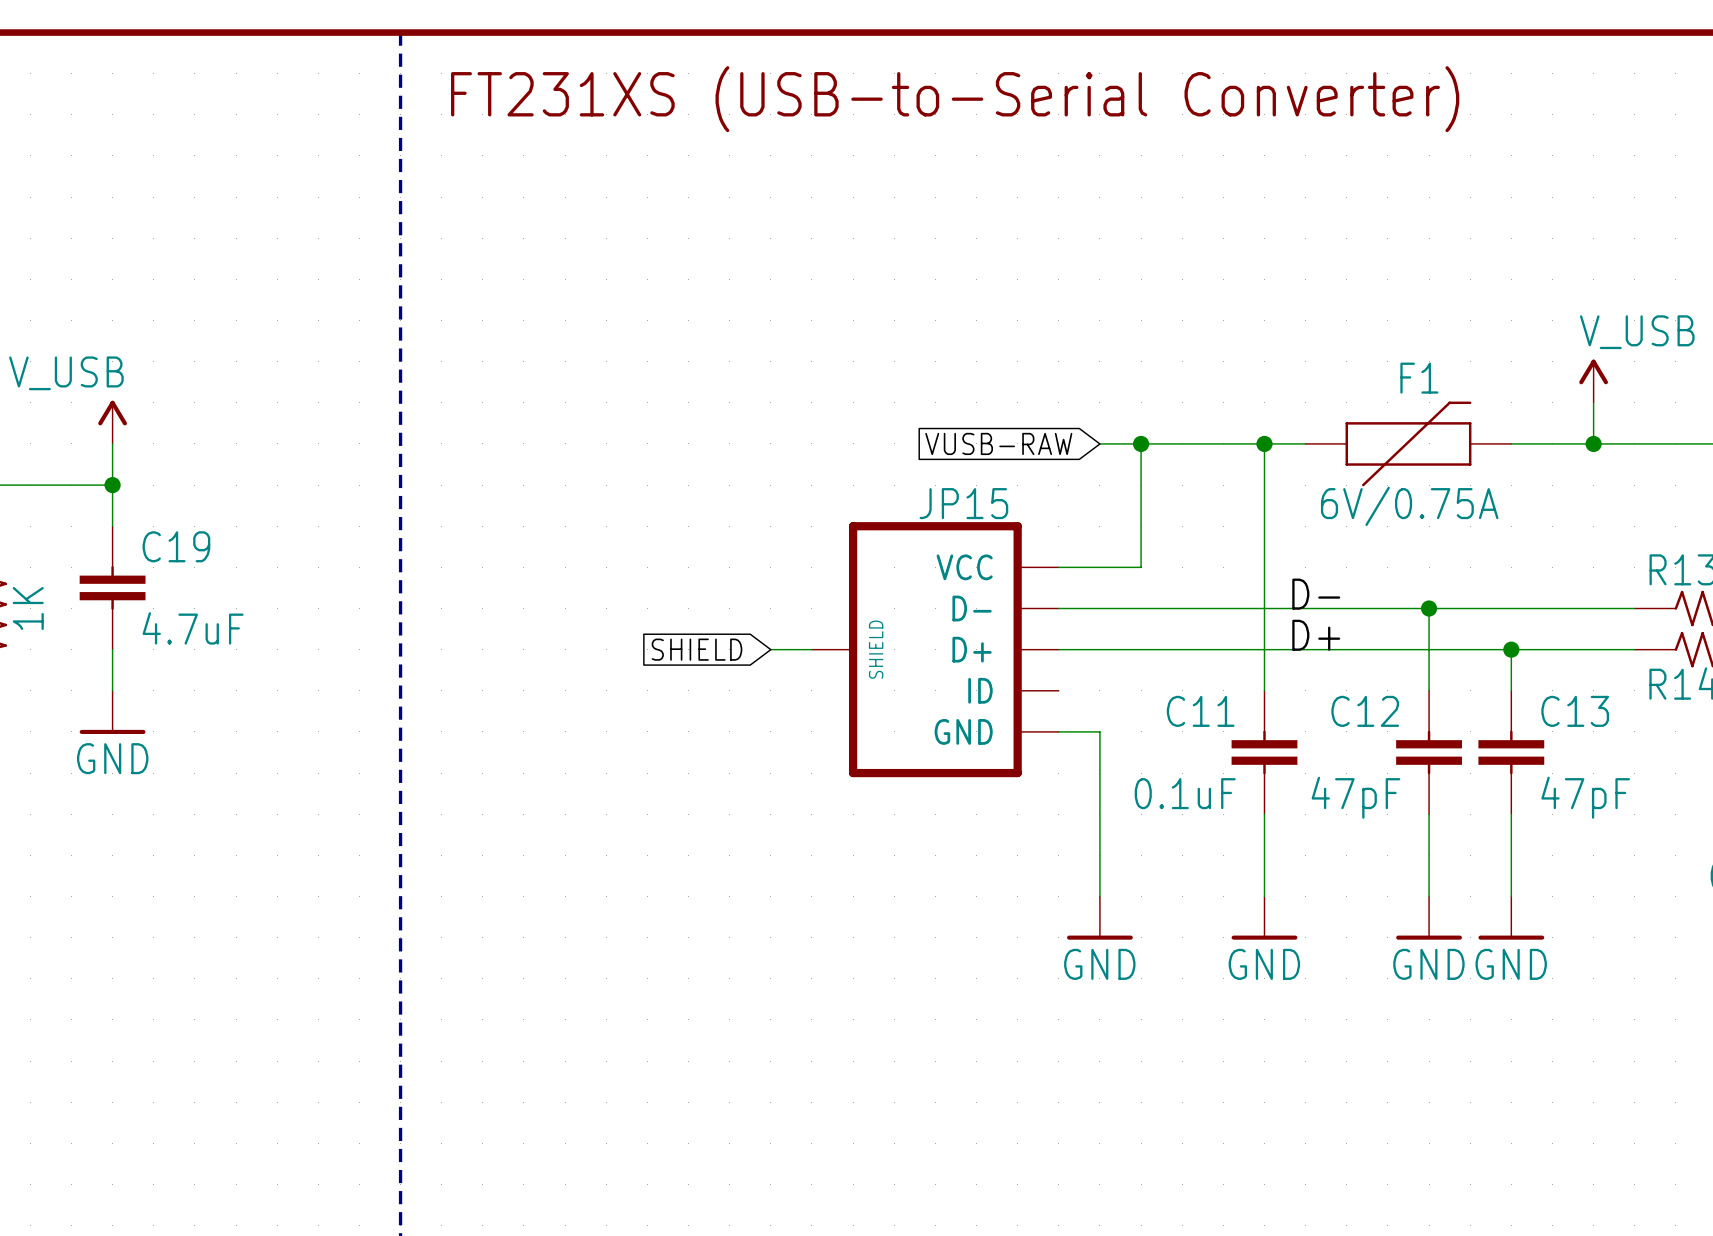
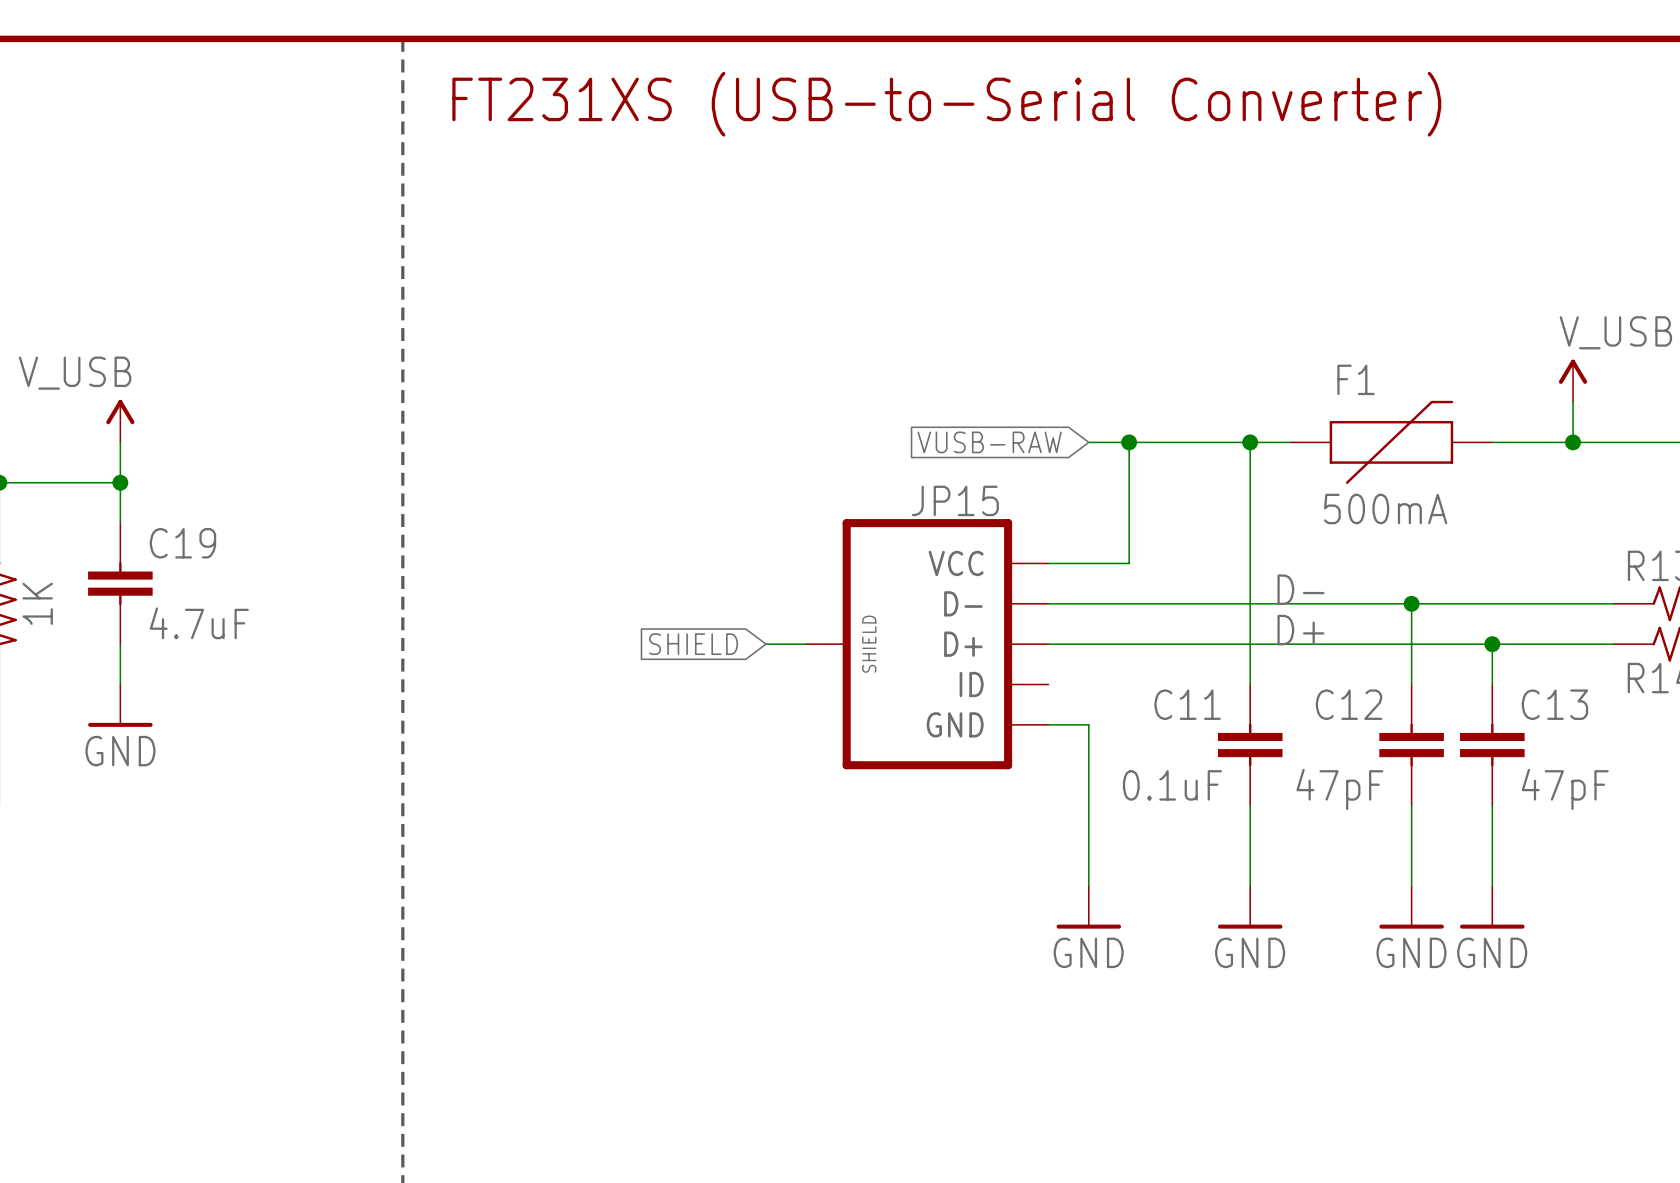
F1 name position: F1 (1419, 378) -> F1 (1356, 379)
F1 value: 6V/0.75A (1409, 506) -> 500mA (1385, 508)

